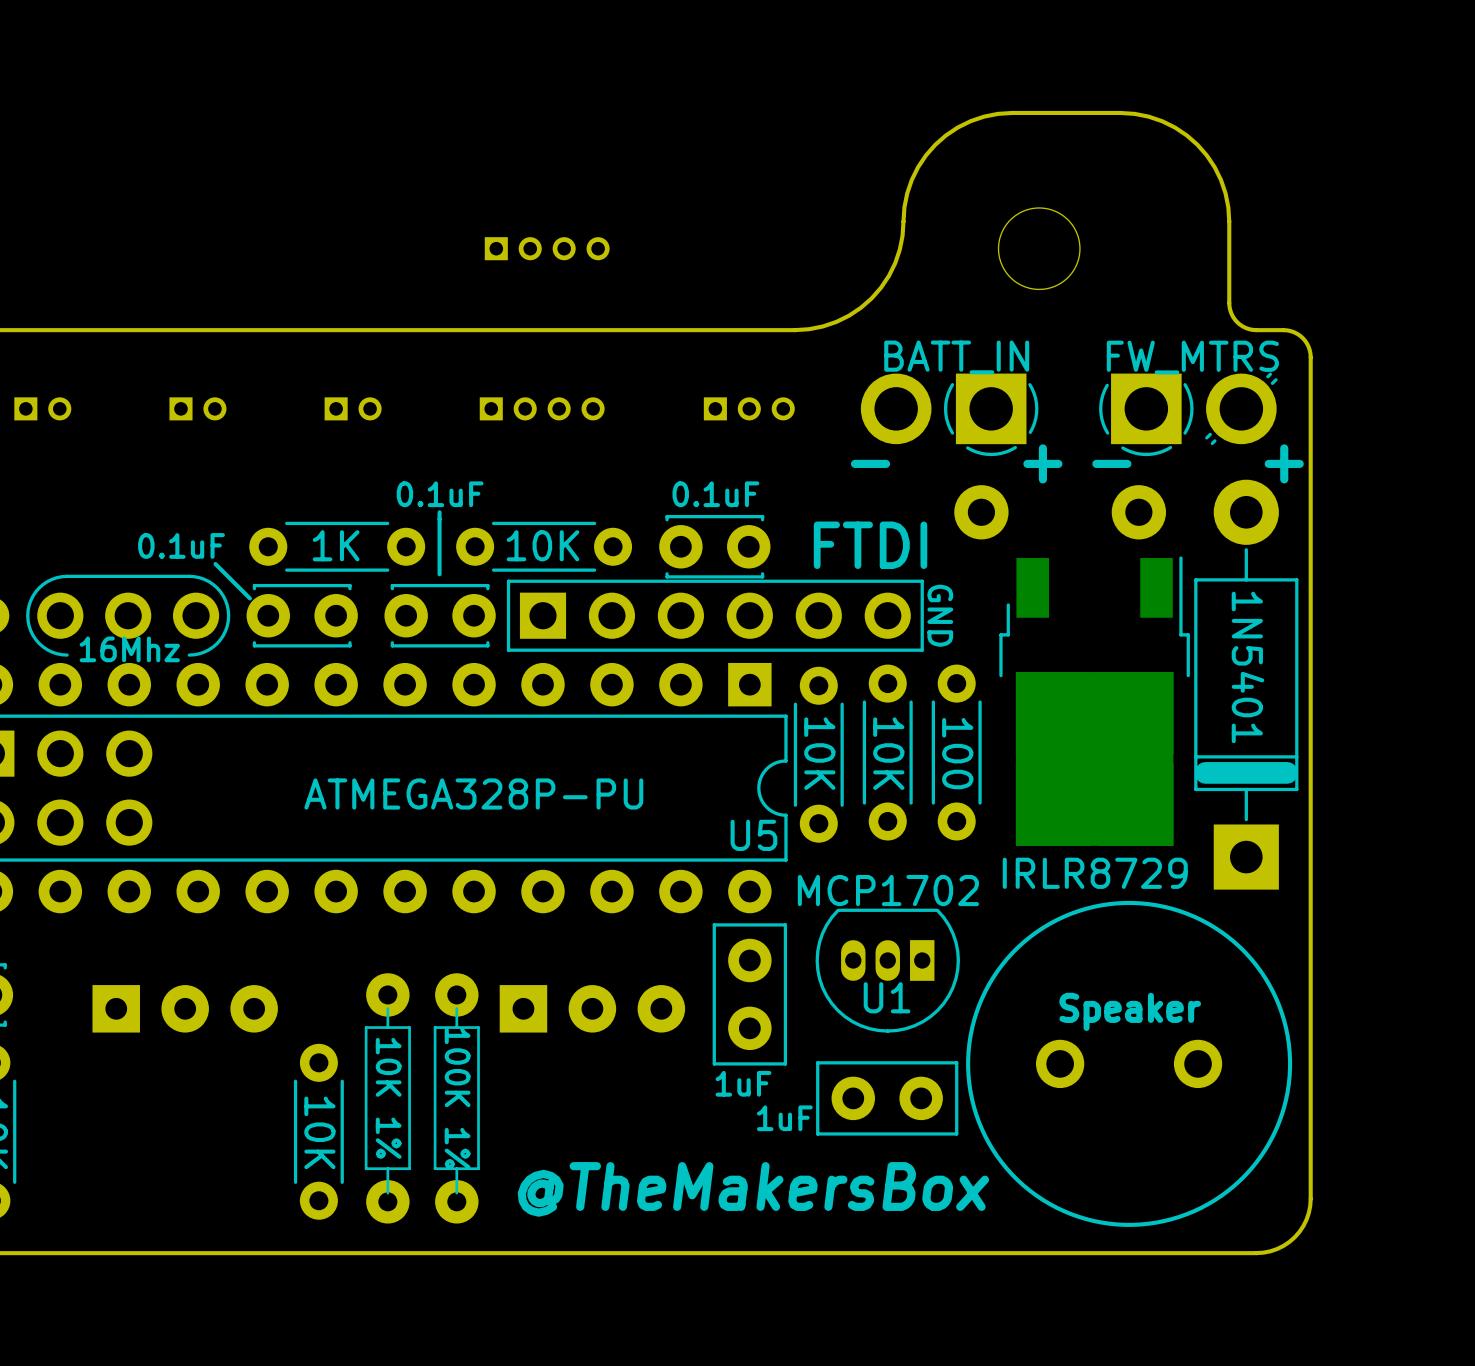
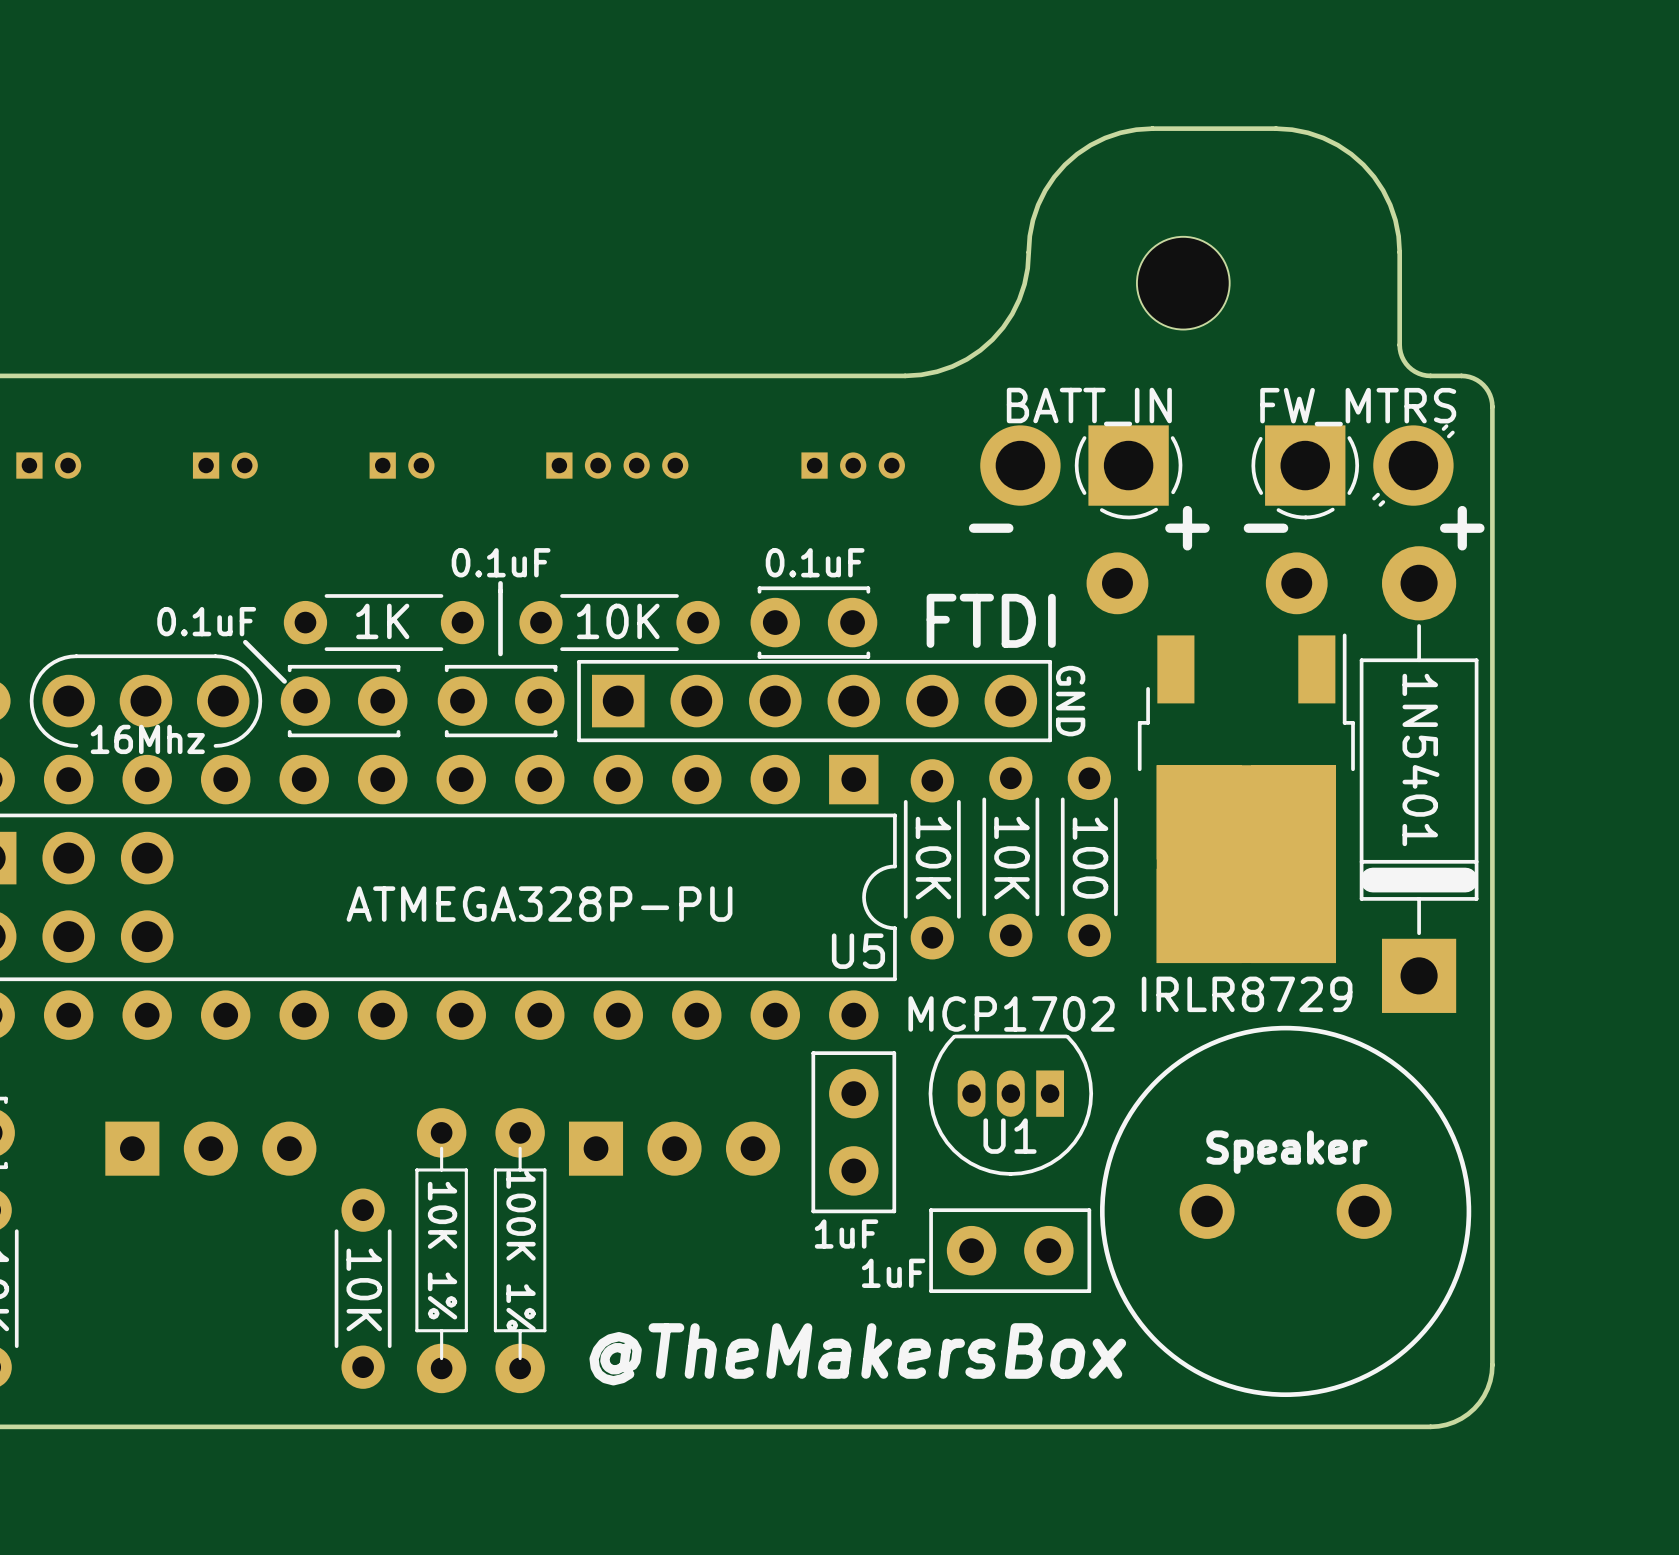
part: (547, 248) -> none

